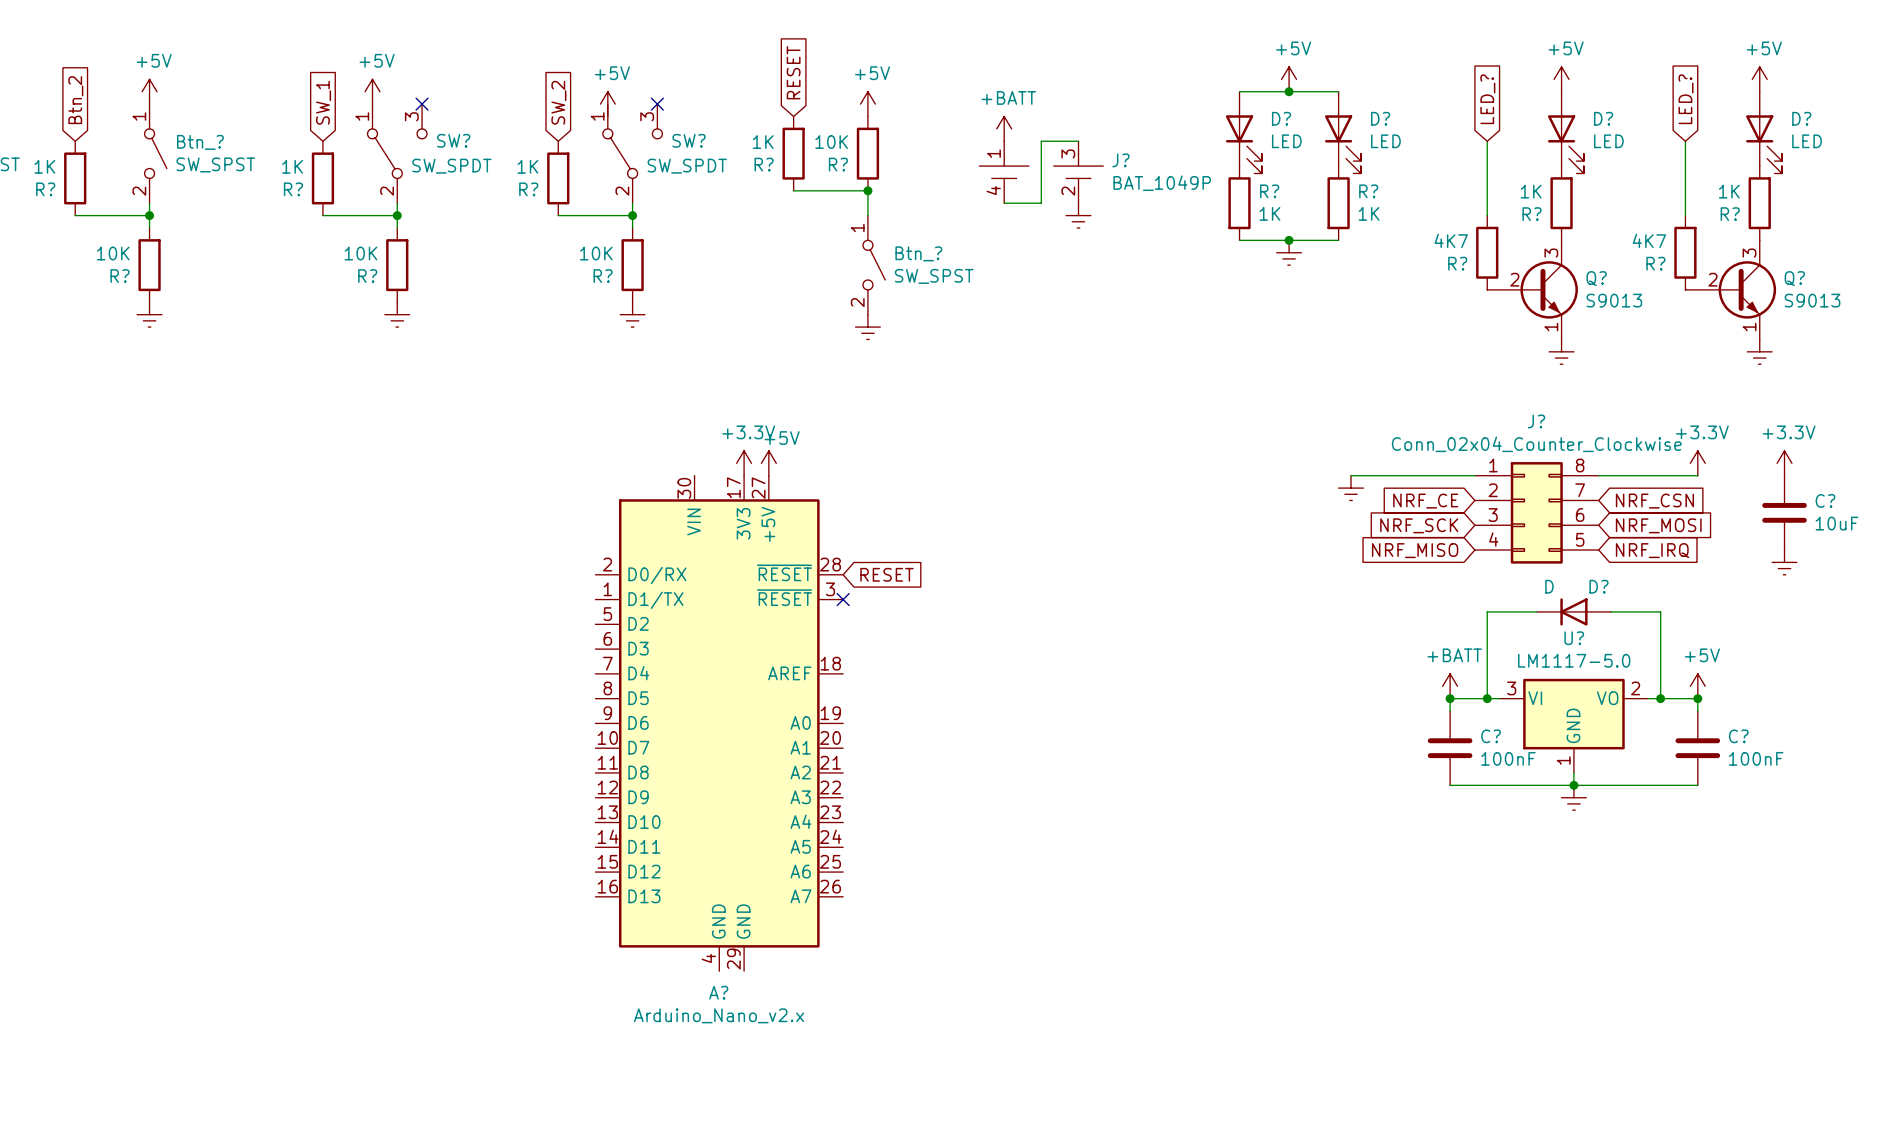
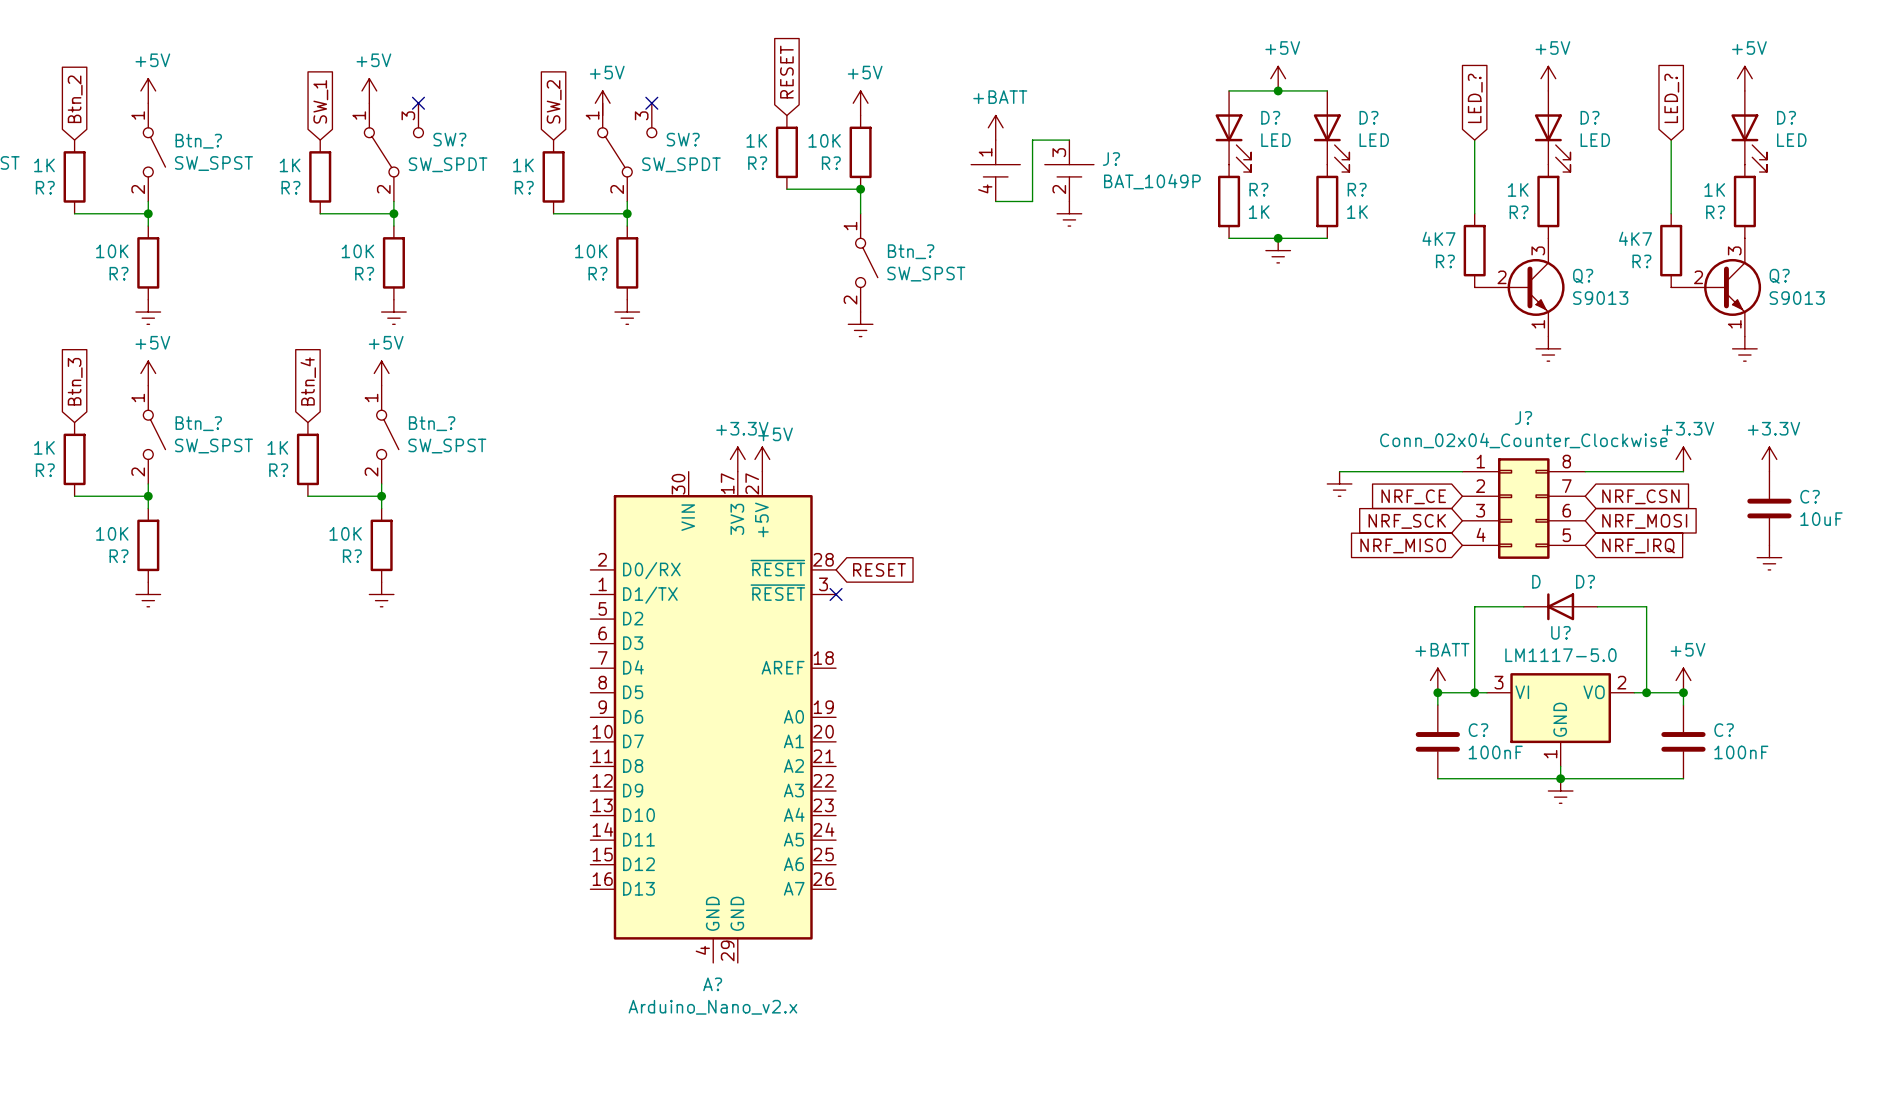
power symbol: none -> +5V (148, 373)
power symbol: none -> +5V (381, 373)
global label: none -> Btn_3 (75, 381)
global label: none -> Btn_4 (308, 381)
Btn_?: none -> SW_SPST (154, 434)
Btn_?: none -> SW_SPST (387, 434)
R?: none -> 1K (74, 459)
R?: none -> 1K (307, 459)
wire: none -> (148, 483) (148, 508)
wire: none -> (381, 483) (381, 508)
wire: none -> (74, 496) (148, 496)
junction: none -> (148, 496)
wire: none -> (307, 496) (381, 496)
junction: none -> (381, 496)
R?: none -> 10K (148, 545)
R?: none -> 10K (381, 545)
power symbol: none -> (148, 594)
power symbol: none -> (381, 594)

